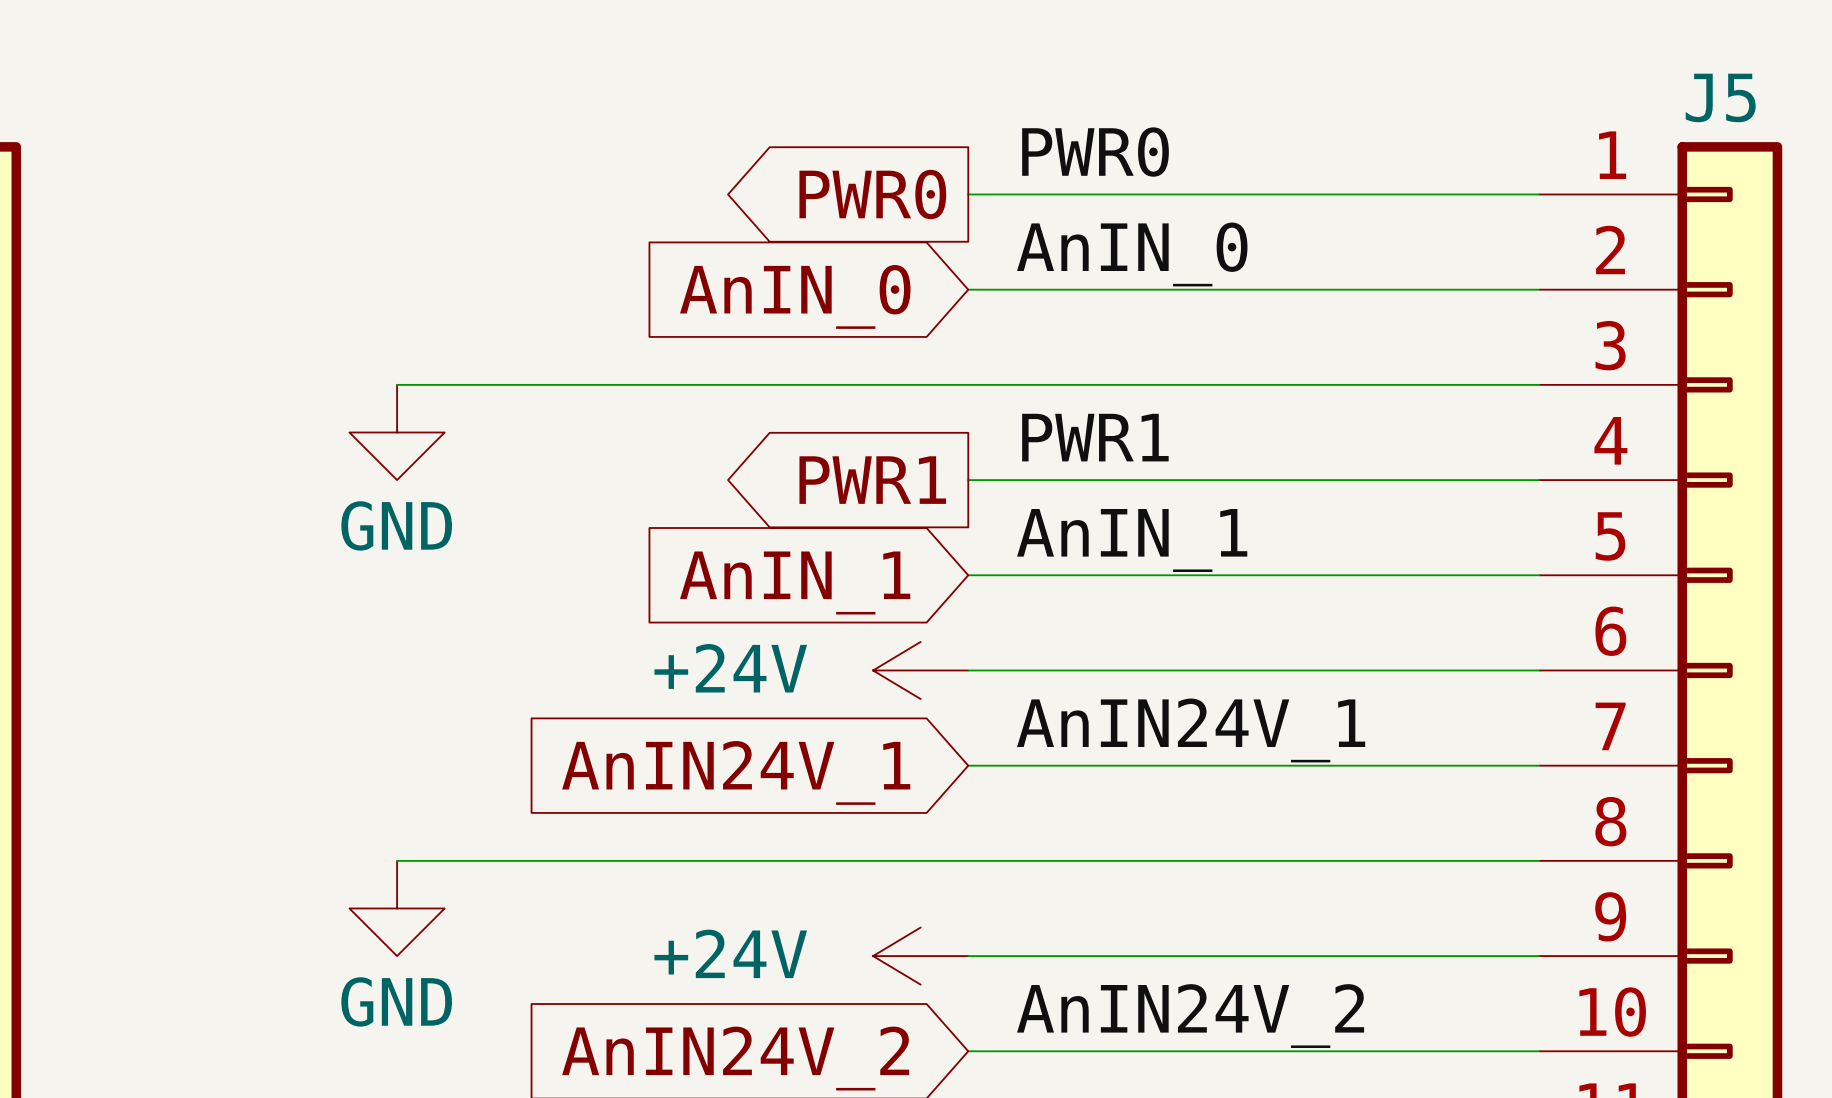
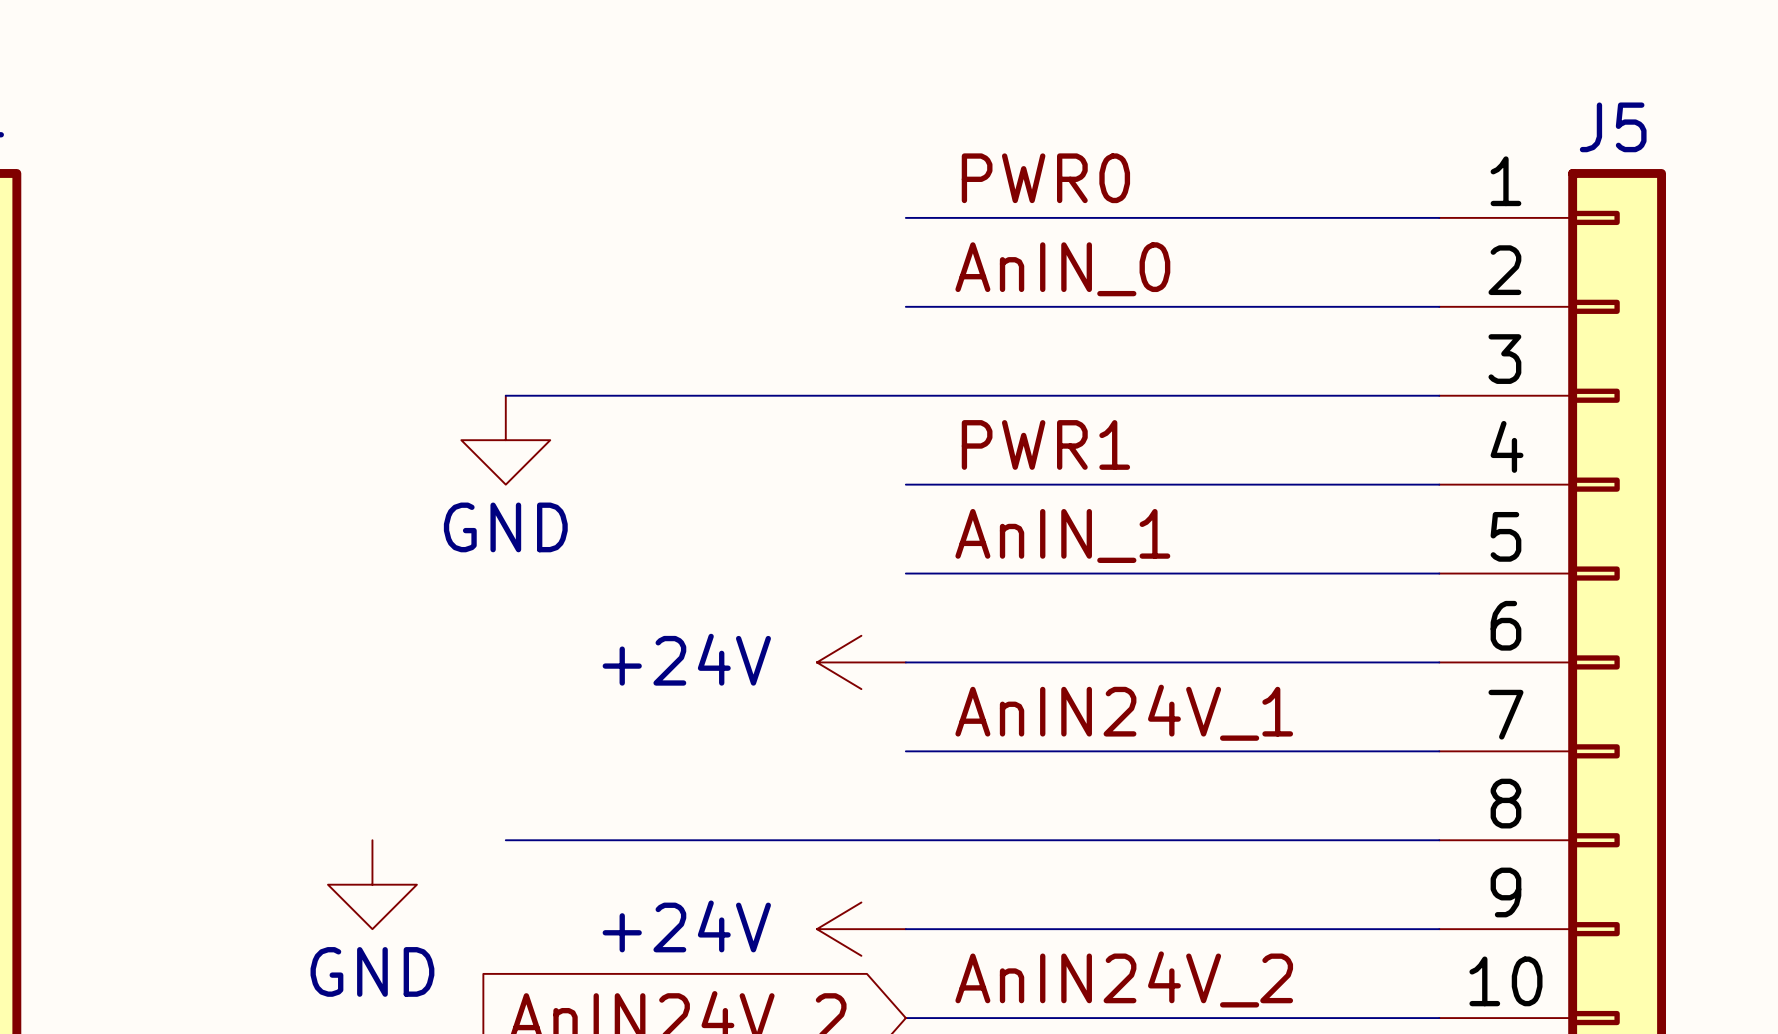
global label: PWR0 (872, 194) -> none
global label: AnIN_0 (795, 296) -> none
wire: (397, 384) (539, 384) -> none
power symbol position: GND (397, 432) -> GND (505, 440)
global label: PWR1 (872, 480) -> none
global label: AnIN_1 (795, 582) -> none
global label: AnIN24V_1 (736, 772) -> none
wire: (397, 860) (539, 860) -> none

